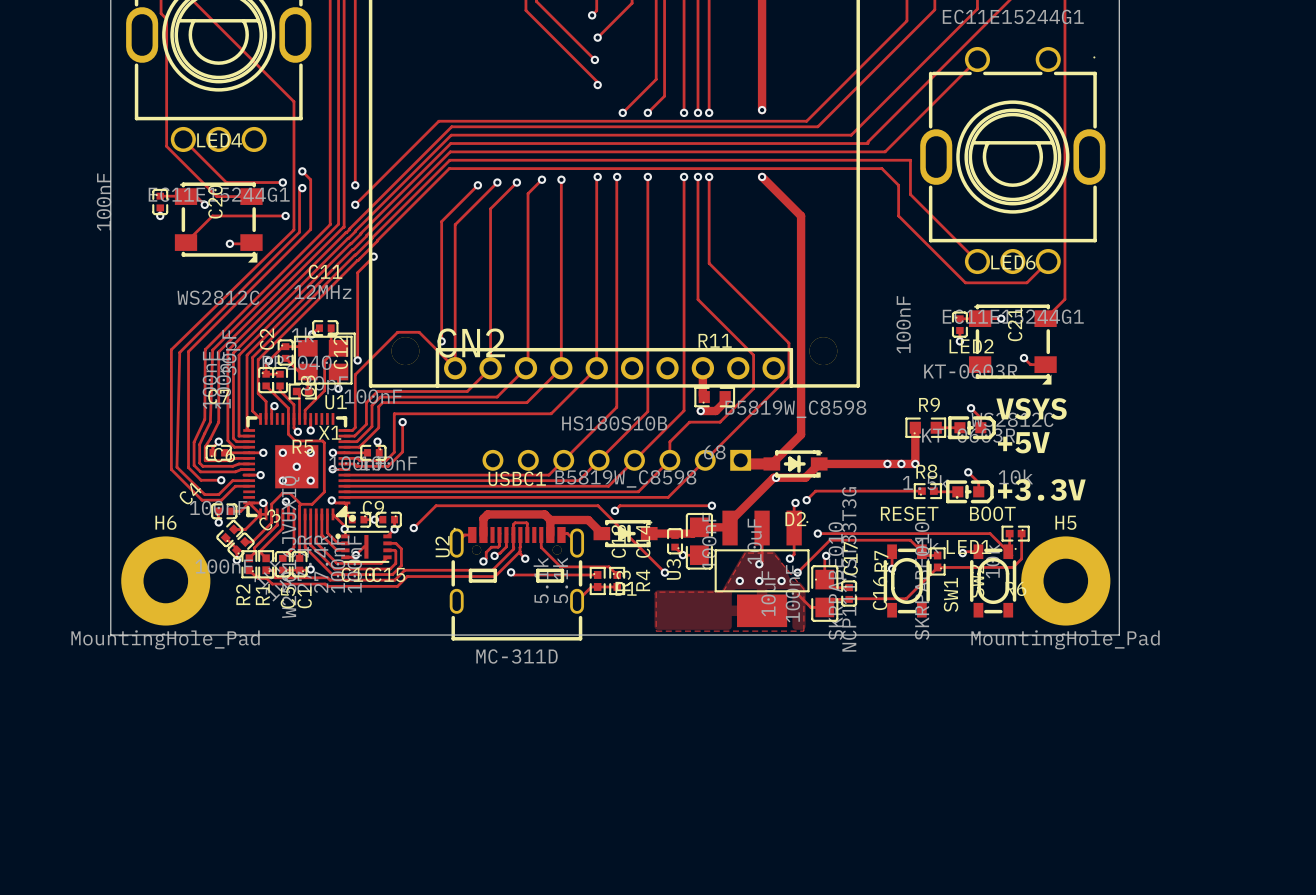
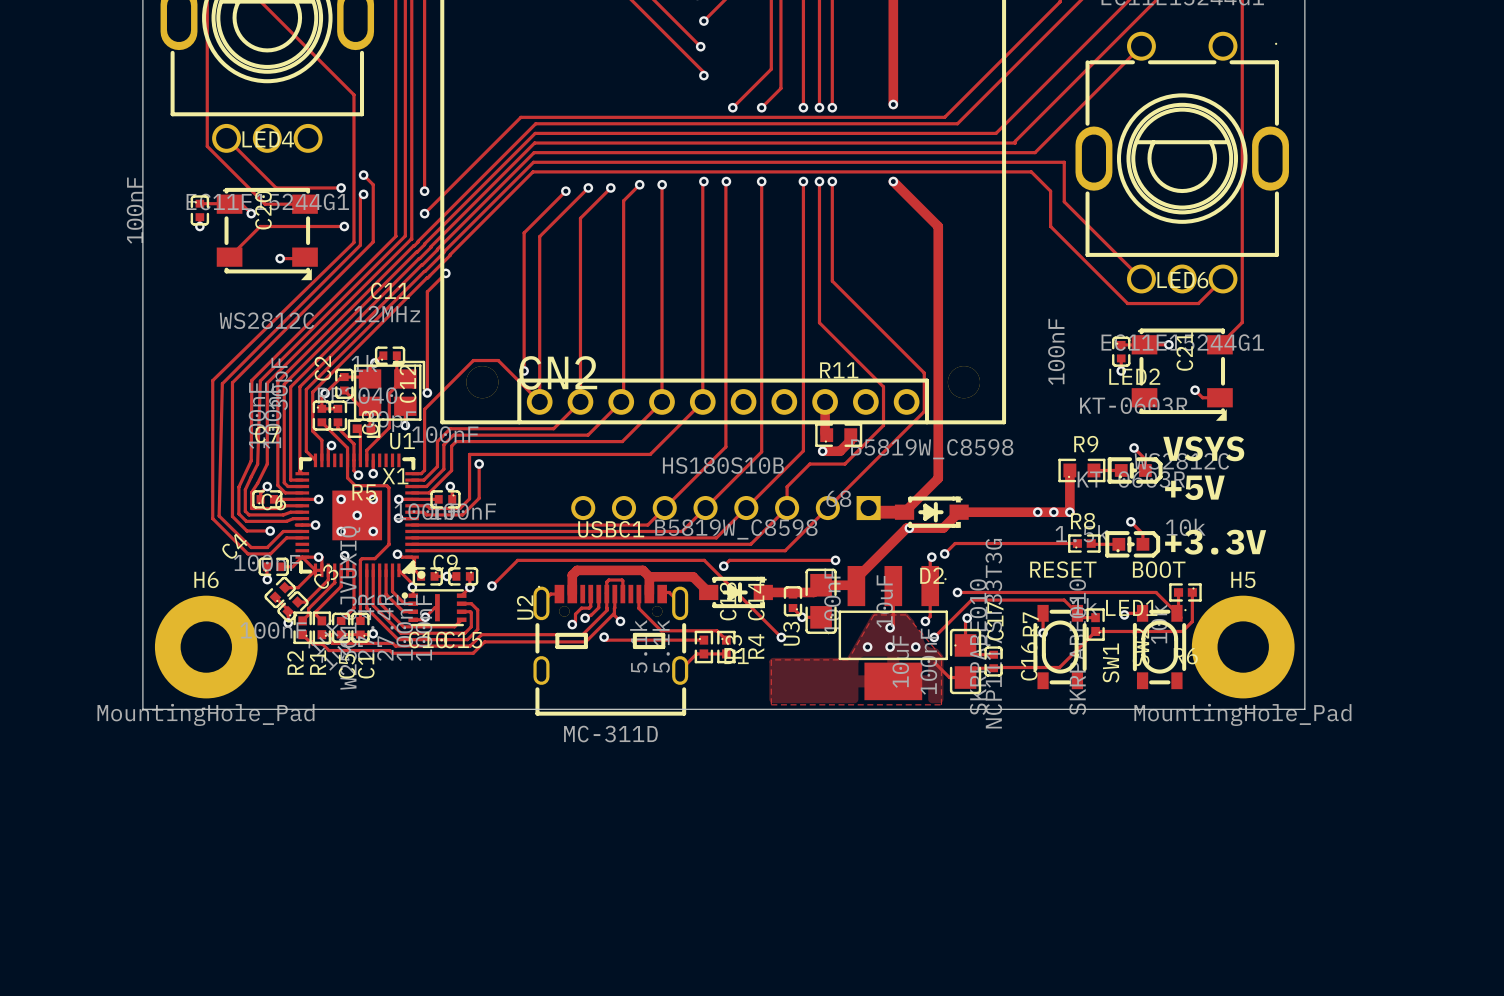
track: (300, 504) (290, 493) (282, 493) (271, 504) (271, 514) -> none

